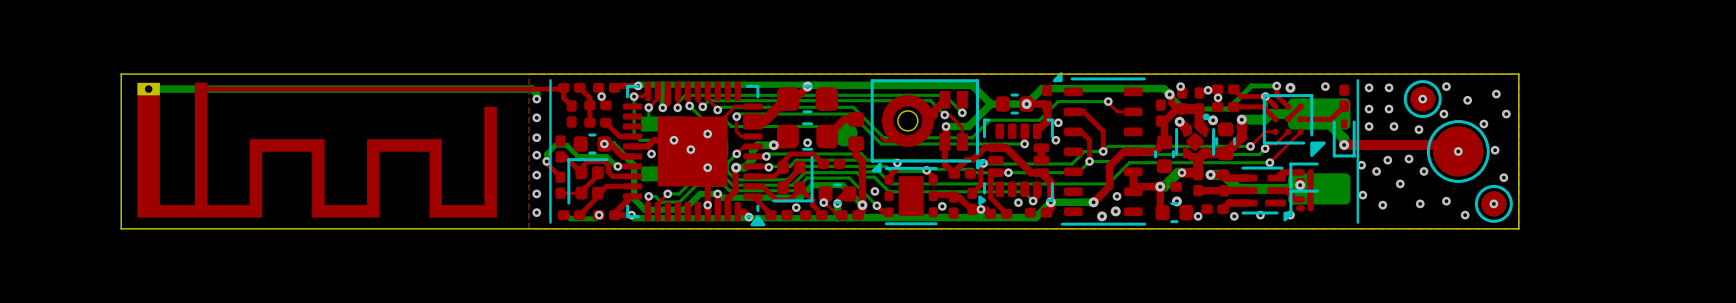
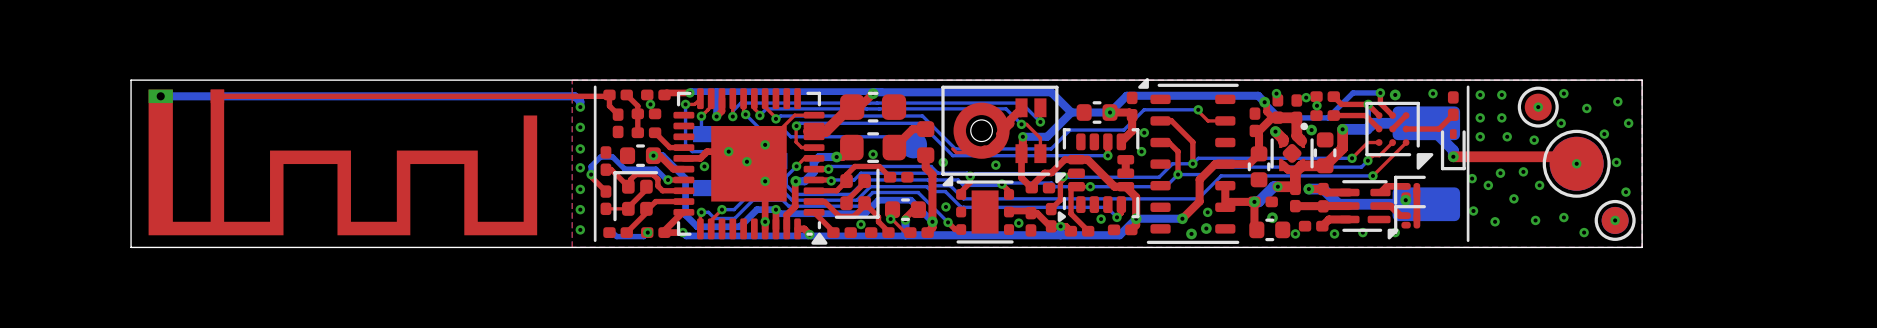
via: none -> (943, 162)
via: none -> (995, 165)

